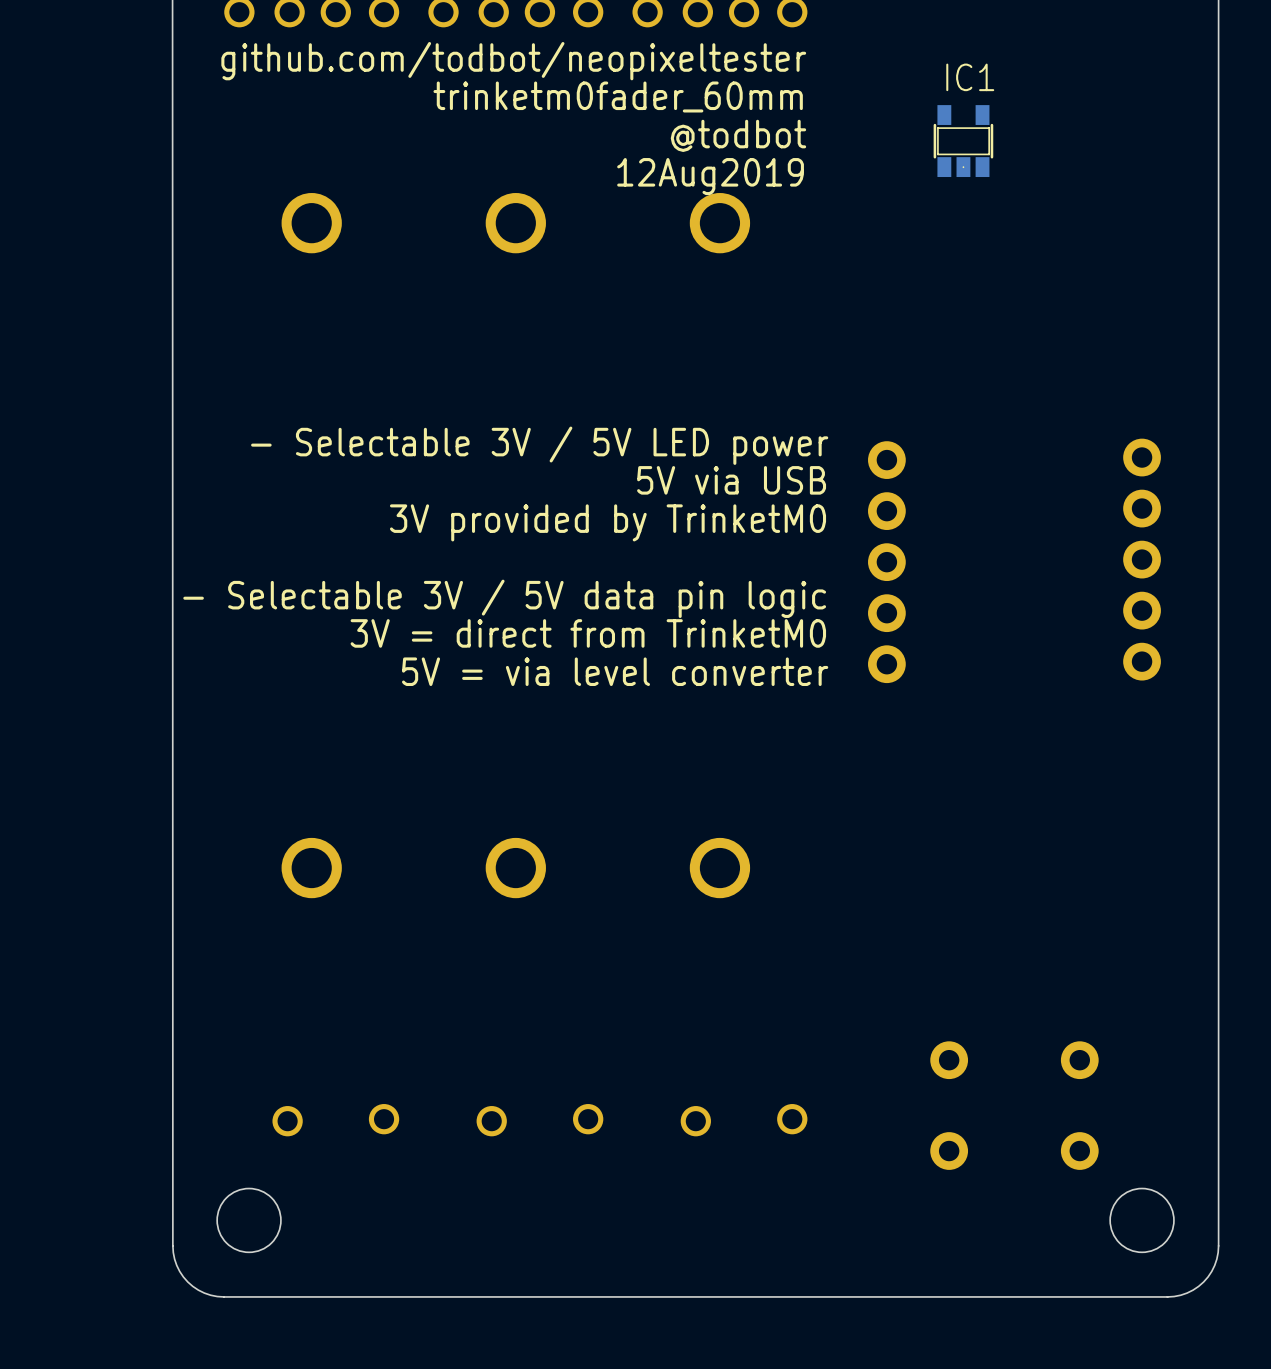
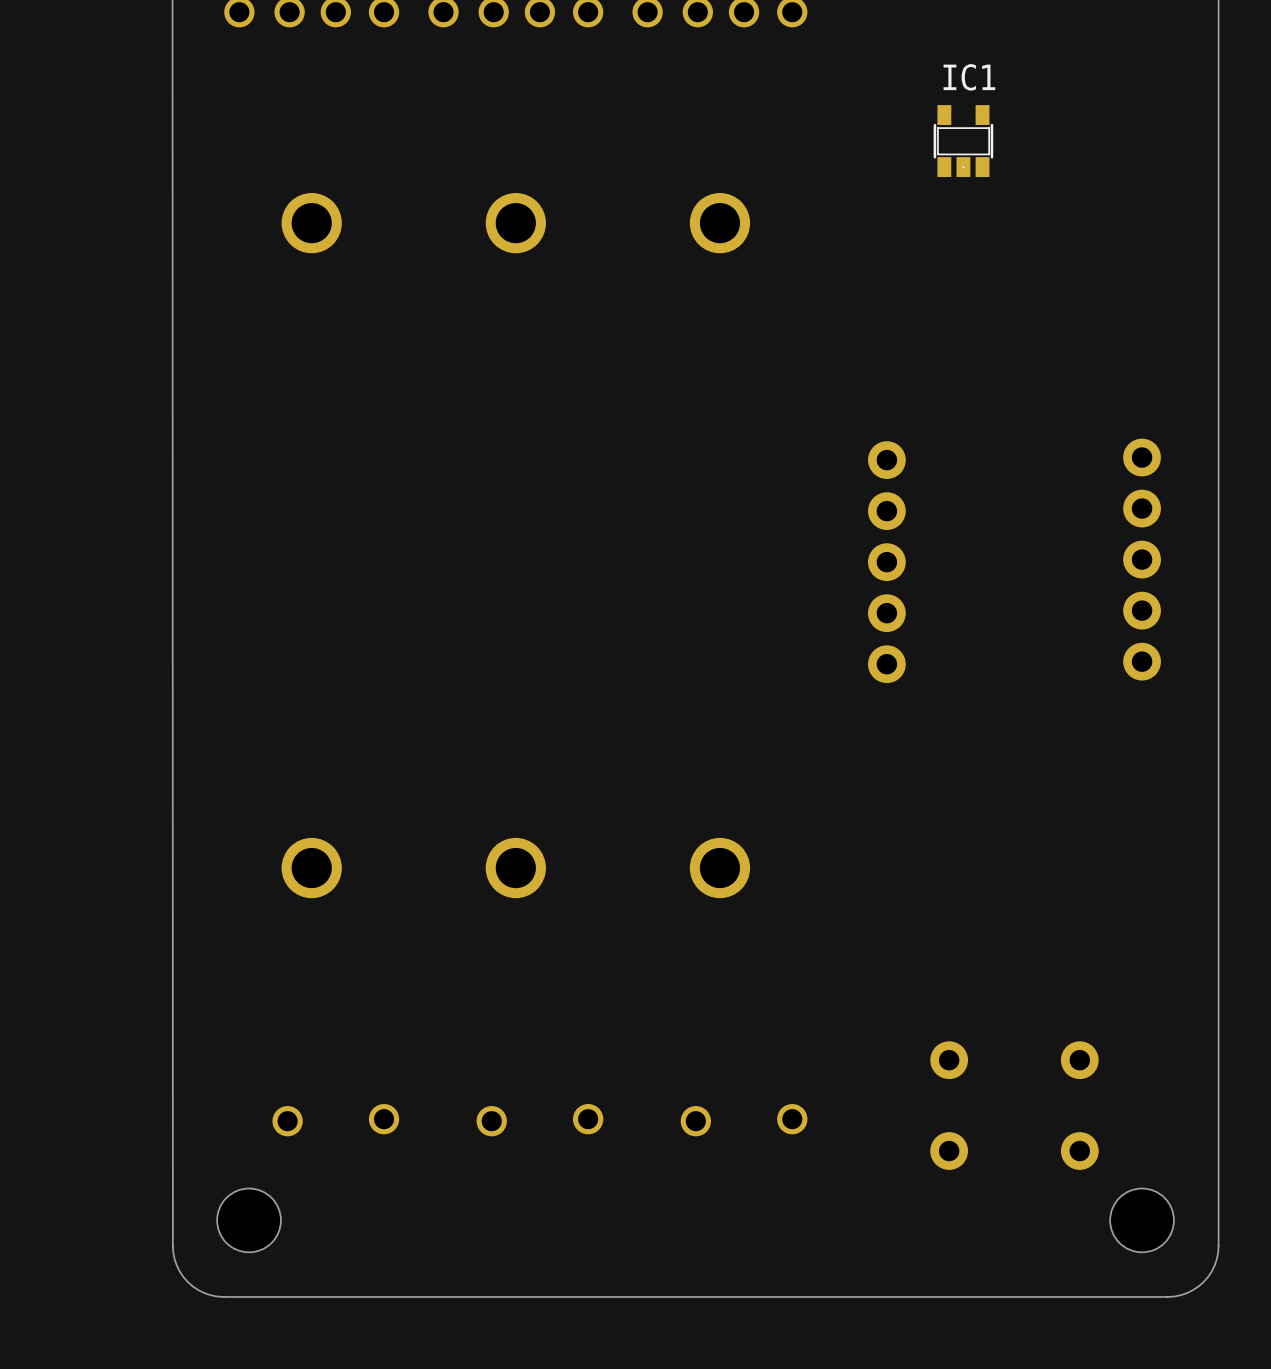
text: github.com/todbot/neopixeltester (513, 61) -> none
text: trinketm0fader_60mm (618, 96) -> none
text: @todbot (738, 135) -> none
text: 12Aug2019 (710, 176) -> none
text: - Selectable 3V / 5V LED power (539, 445) -> none
text: 5V via USB (731, 480) -> none
text: 3V provided by TrinketM0 (608, 522) -> none
text: - Selectable 3V / 5V data pin logic (504, 598) -> none
text: 3V = direct from TrinketM0 (588, 633) -> none
text: 5V = via level converter (615, 671) -> none

